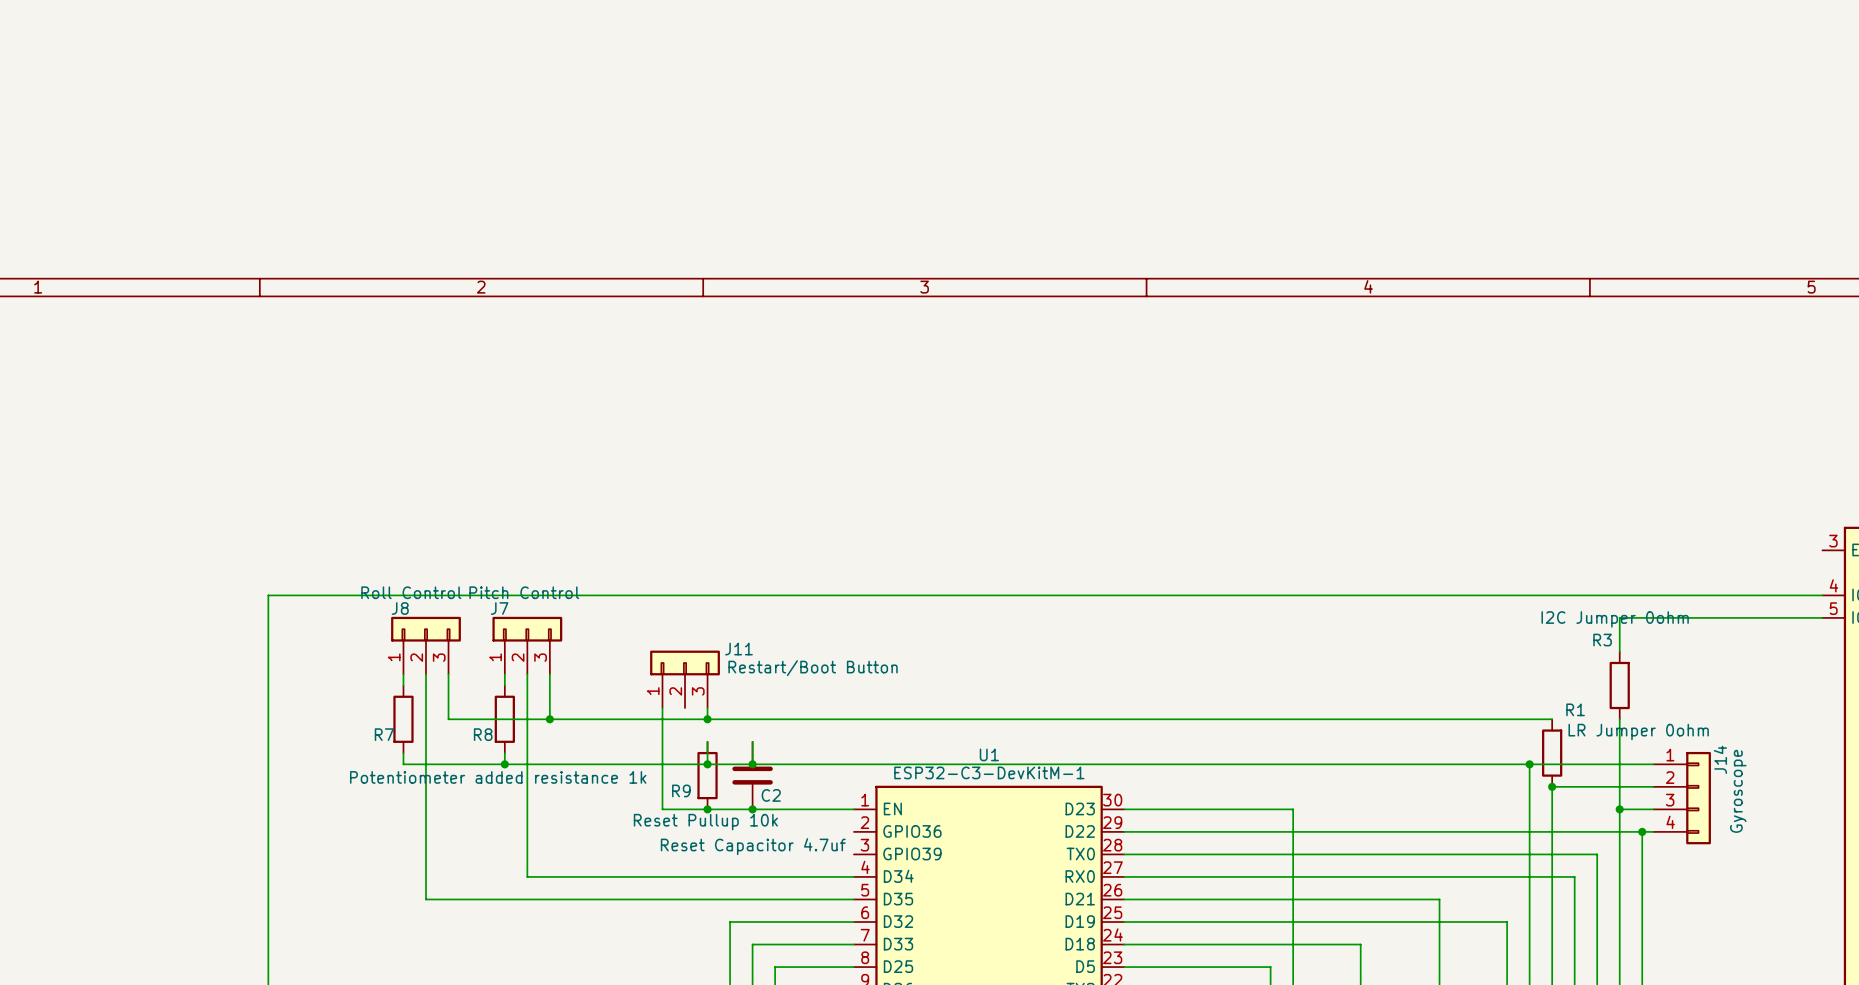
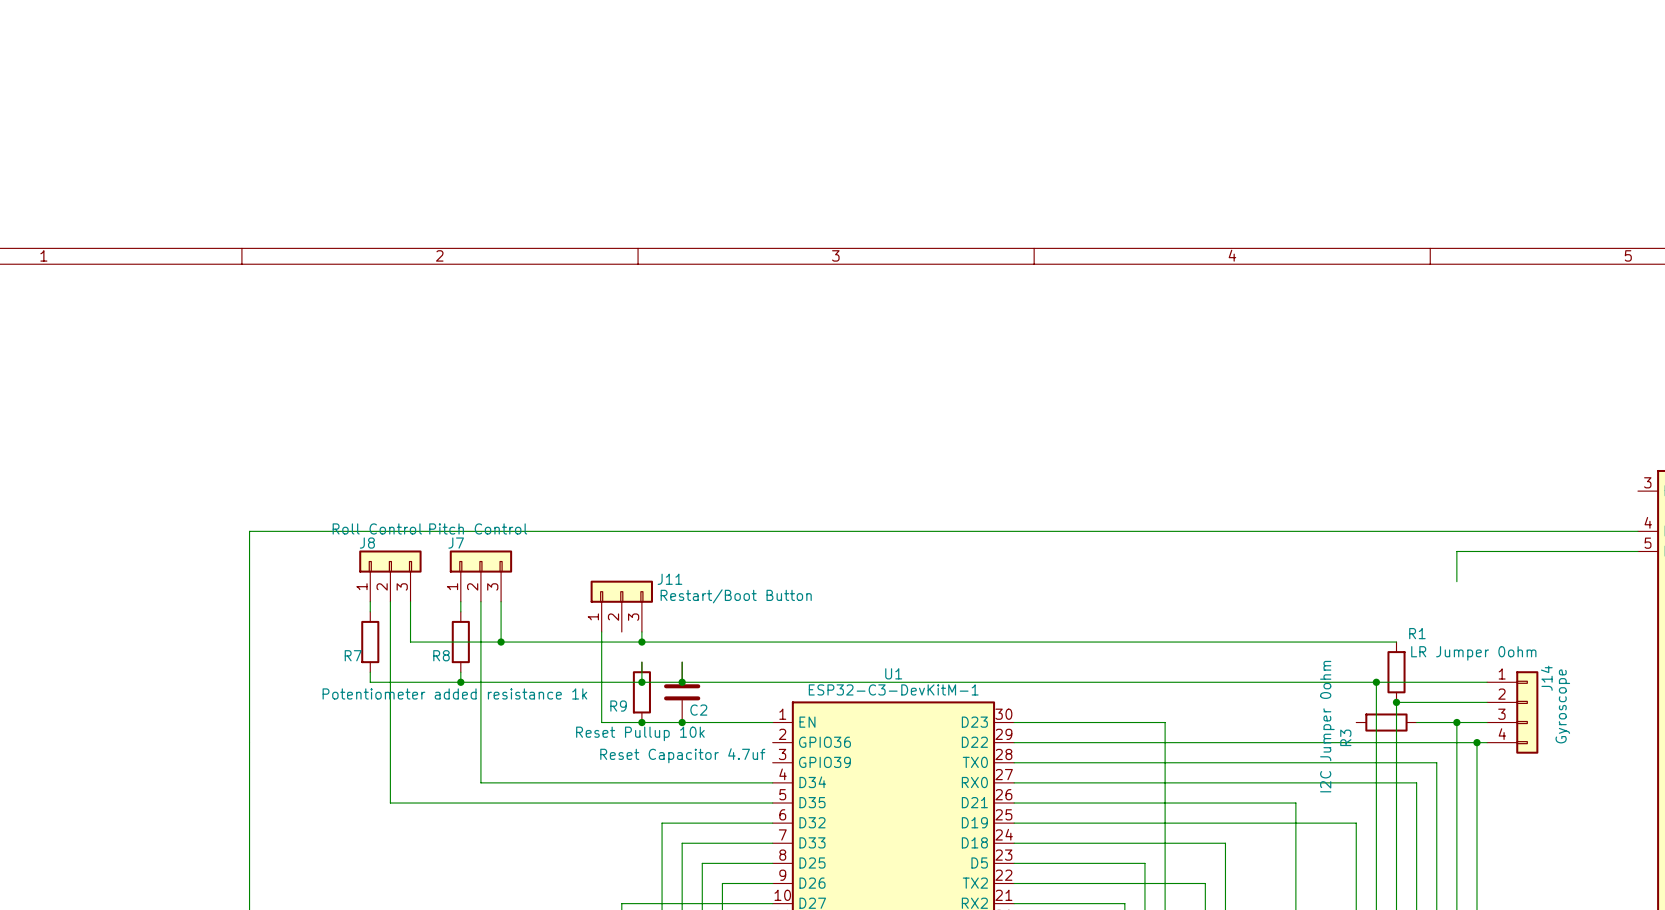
R3 value position: I2C Jumper 0ohm (1615, 619) -> I2C Jumper 0ohm (1327, 726)
R3 name position: R3 (1602, 640) -> R3 (1345, 737)
R3 rotation: 0° (1619, 685) -> 90° clockwise (1386, 722)
R3 position: (1619, 685) -> (1386, 722)
wire: (1619, 719) (1619, 809) -> (1416, 722) (1456, 722)

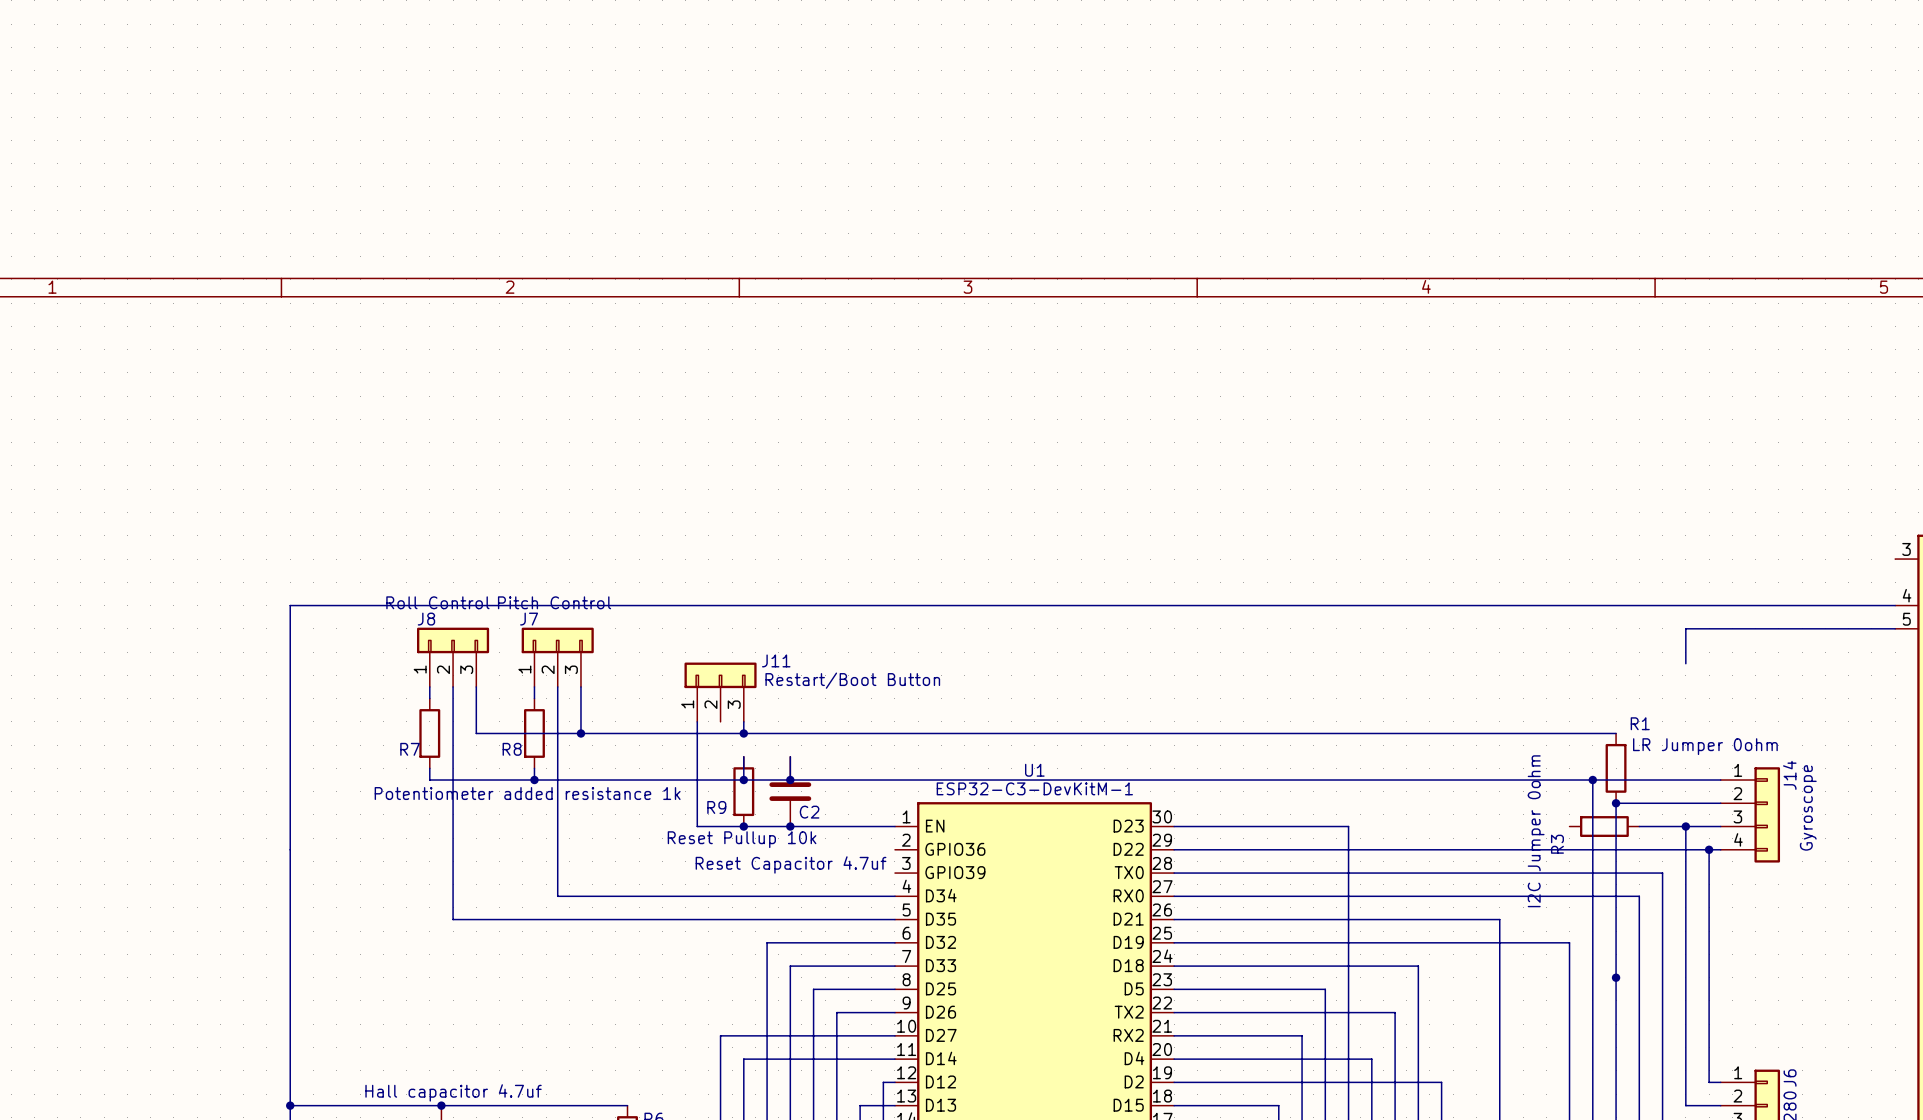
junction: none -> (1616, 977)

